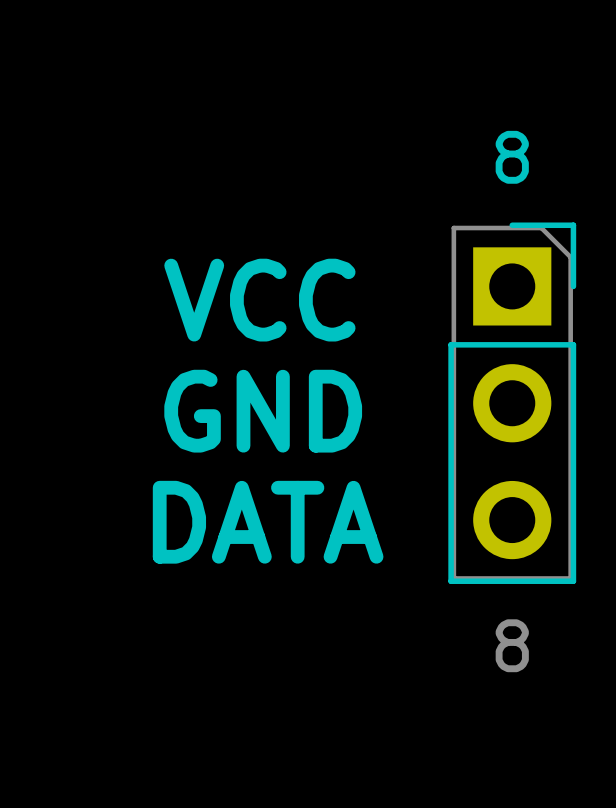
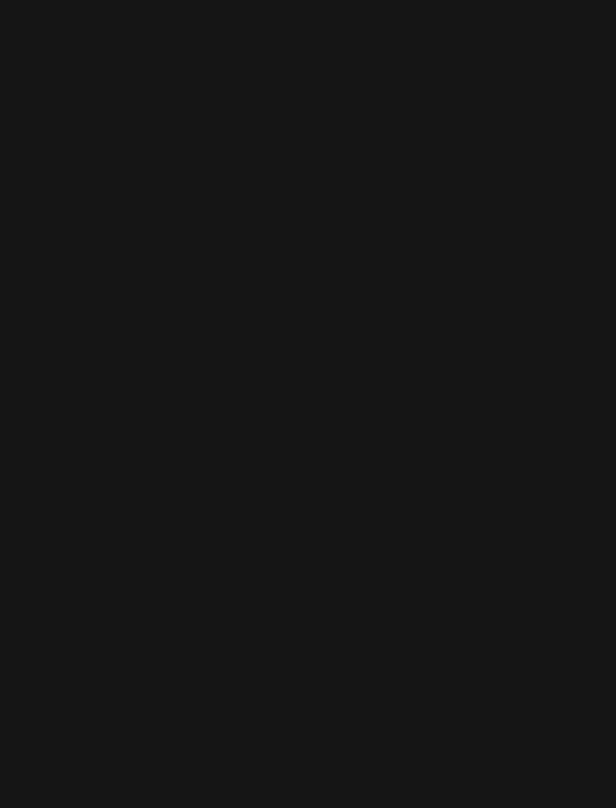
text: VCC (259, 300) -> none
8: 8 (512, 403) -> none
text: GND (263, 411) -> none
text: DATA (268, 522) -> none

